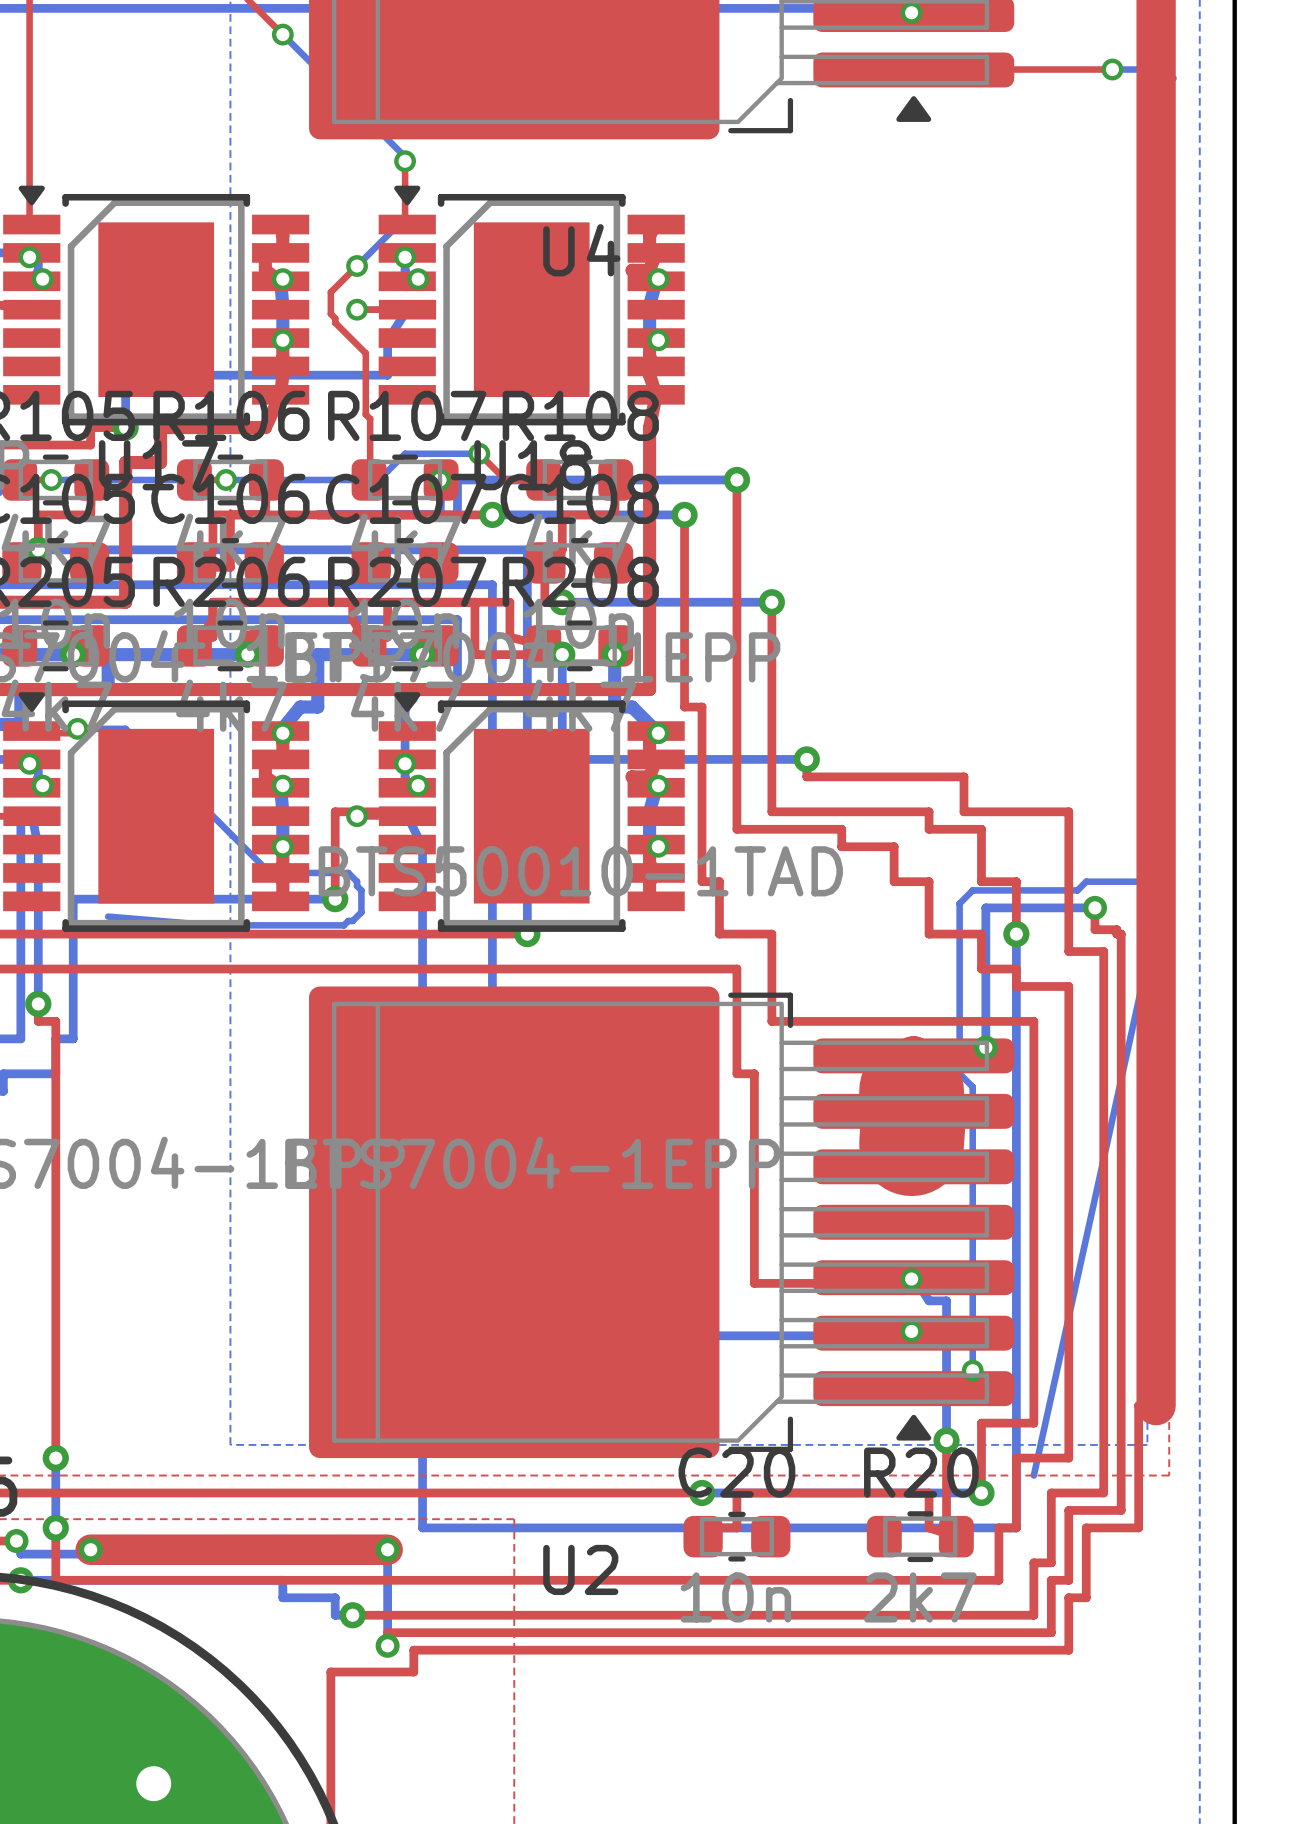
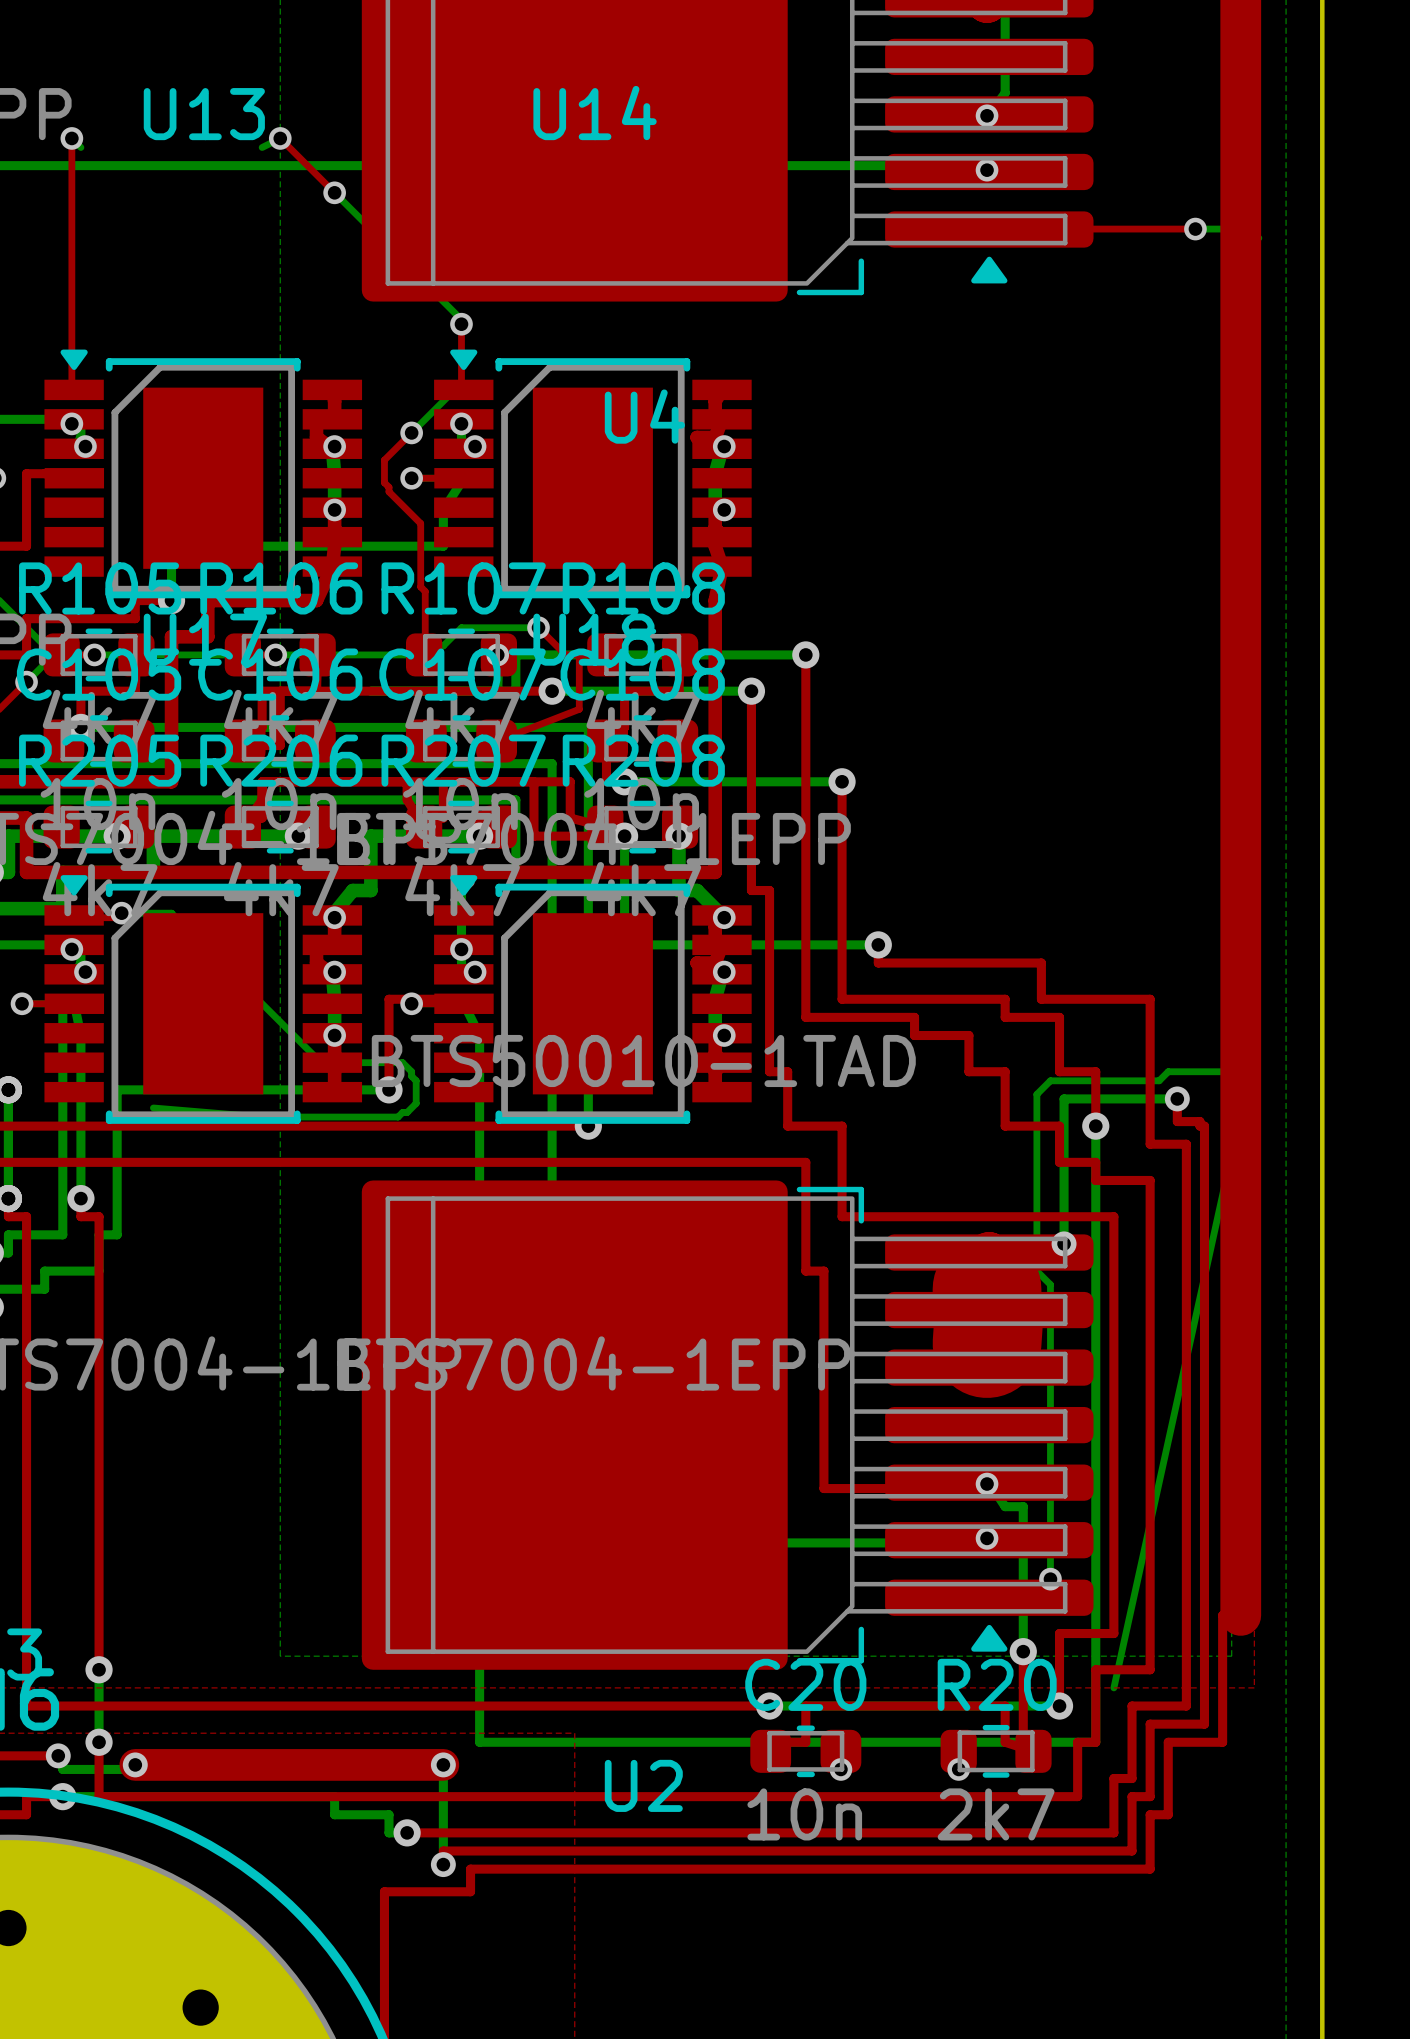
top track: none -> (579, 654) (579, 709) (497, 741)
via: none -> (840, 1769)
via: none -> (958, 1769)

